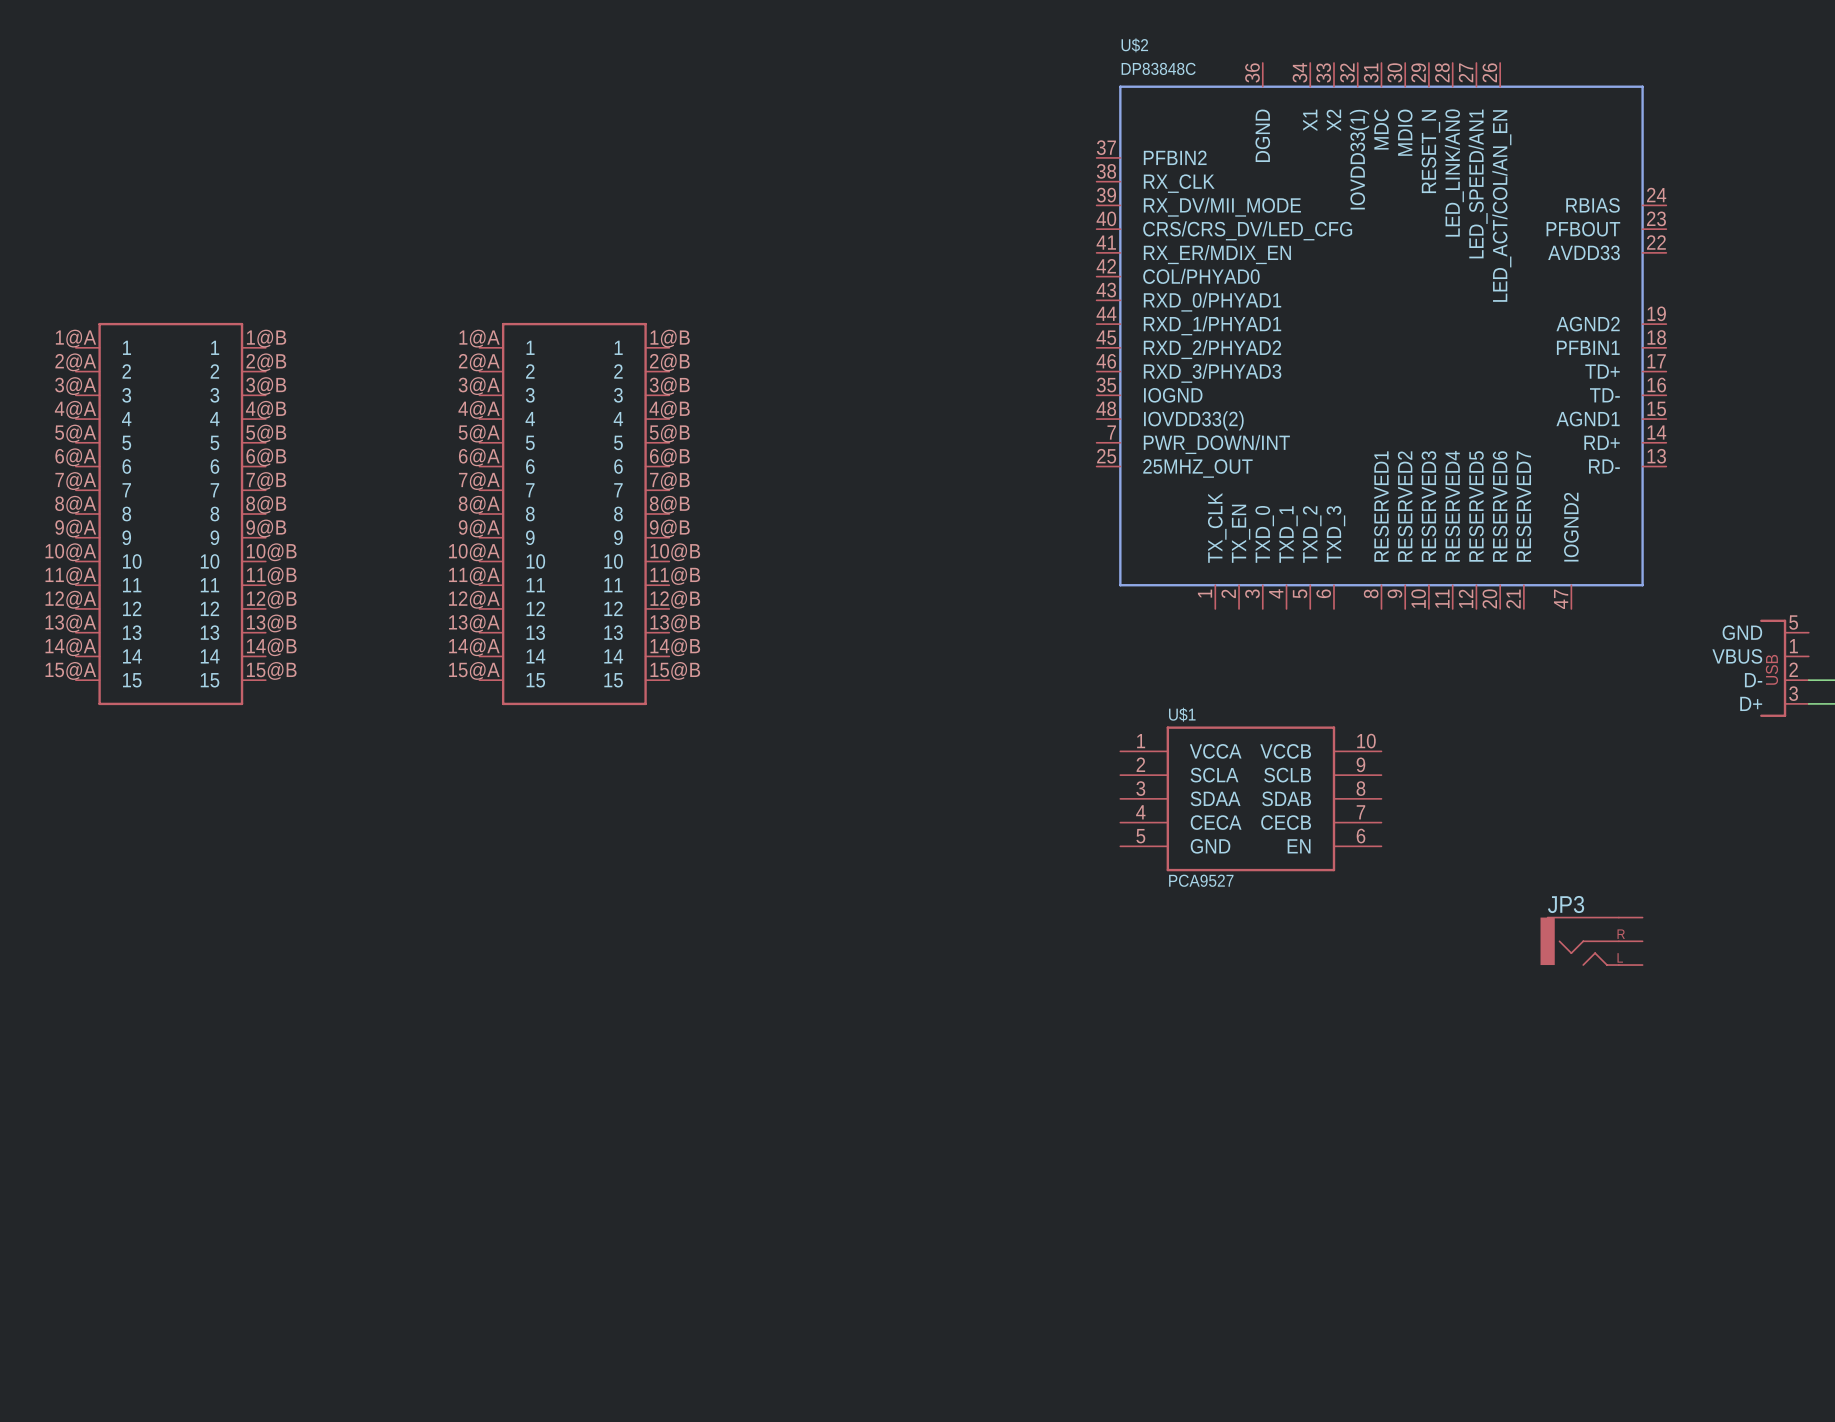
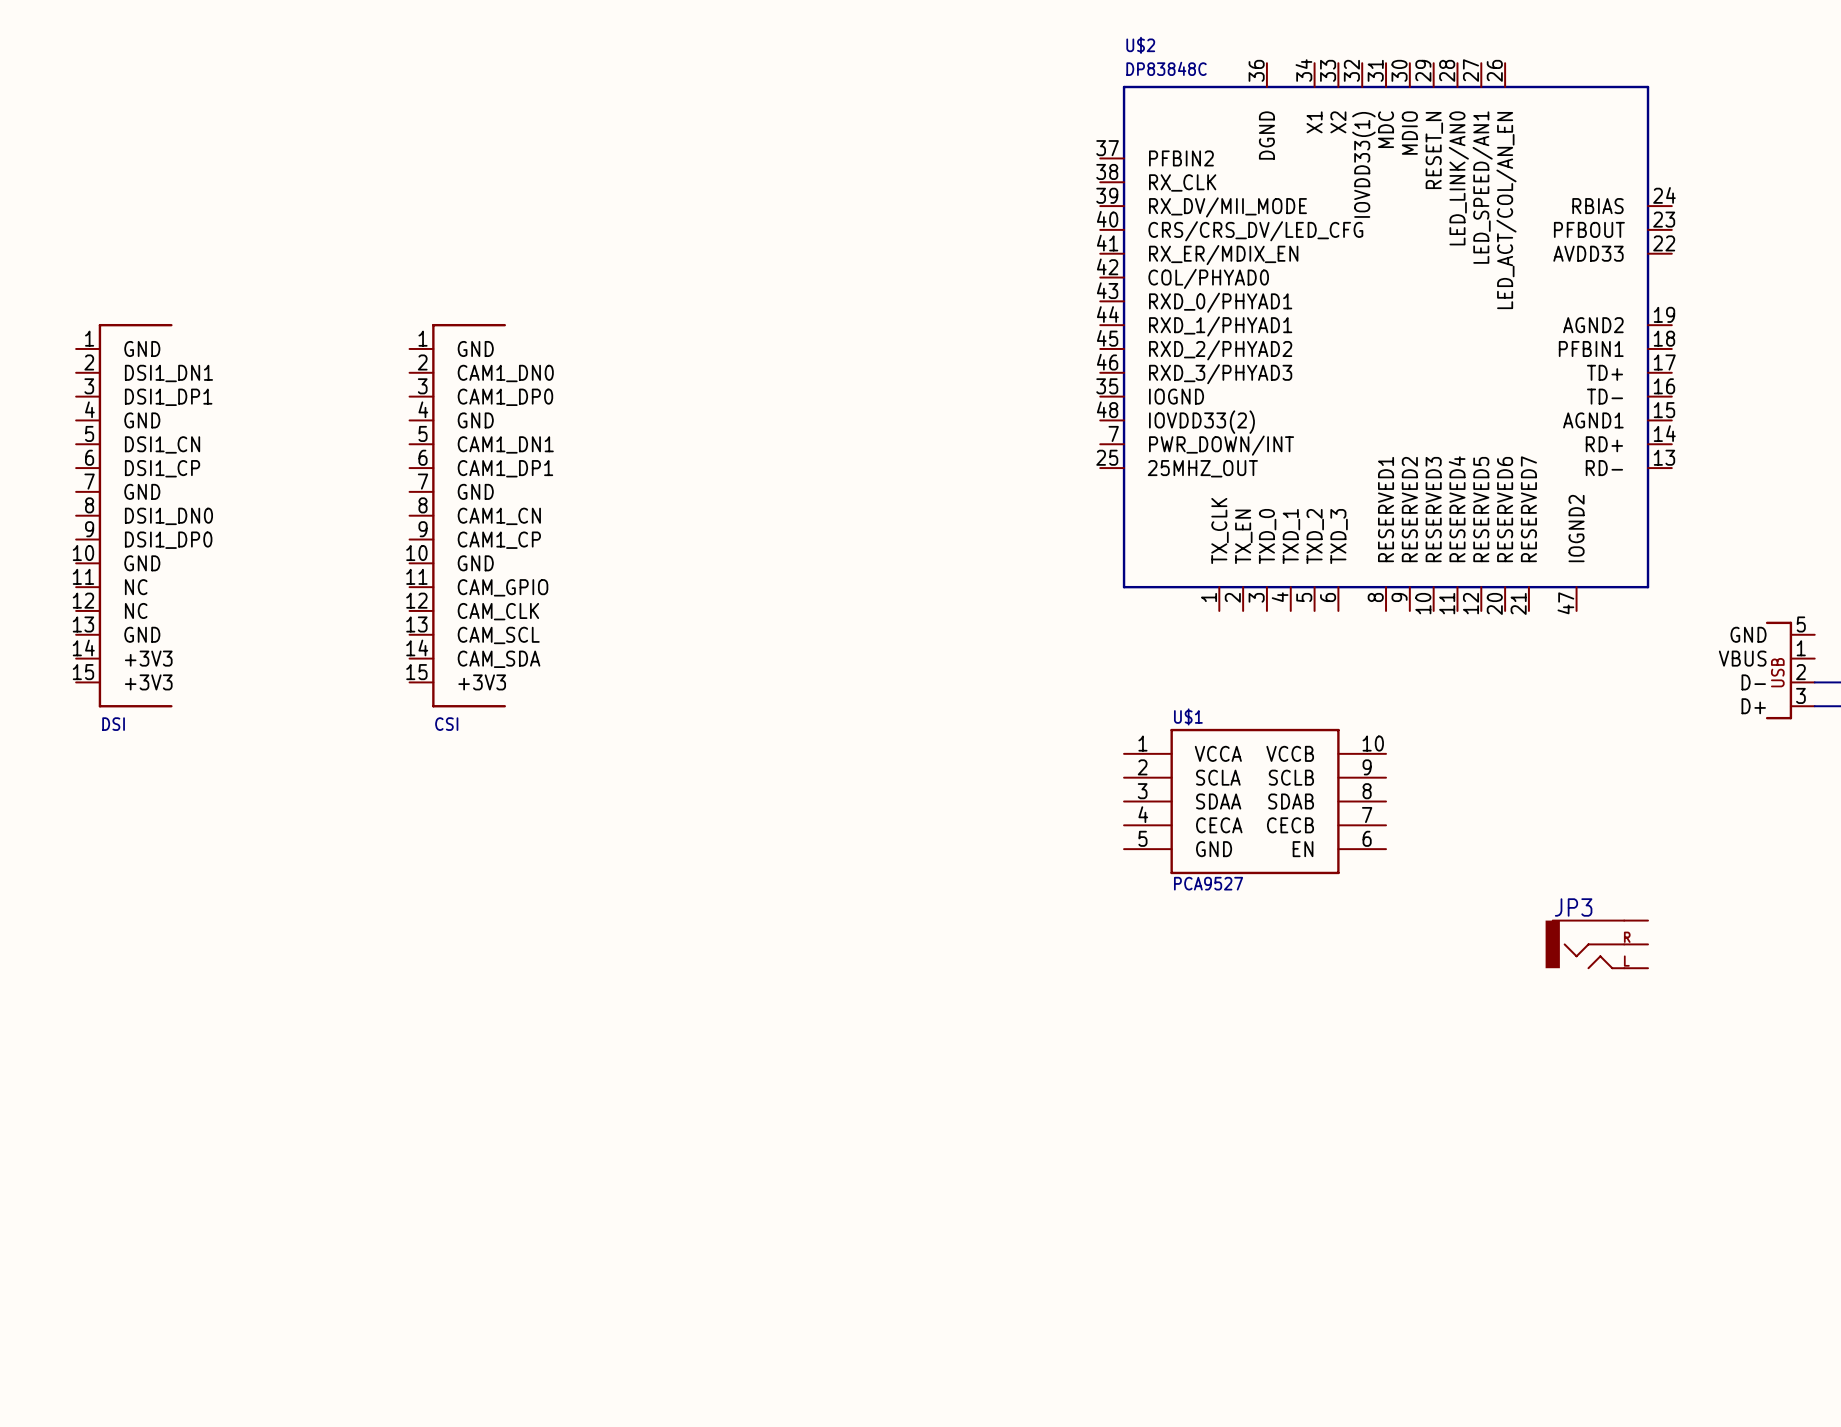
DSI: none -> (124, 515)
part: (170, 514) -> none
CSI: none -> (457, 515)
part: (574, 514) -> none

